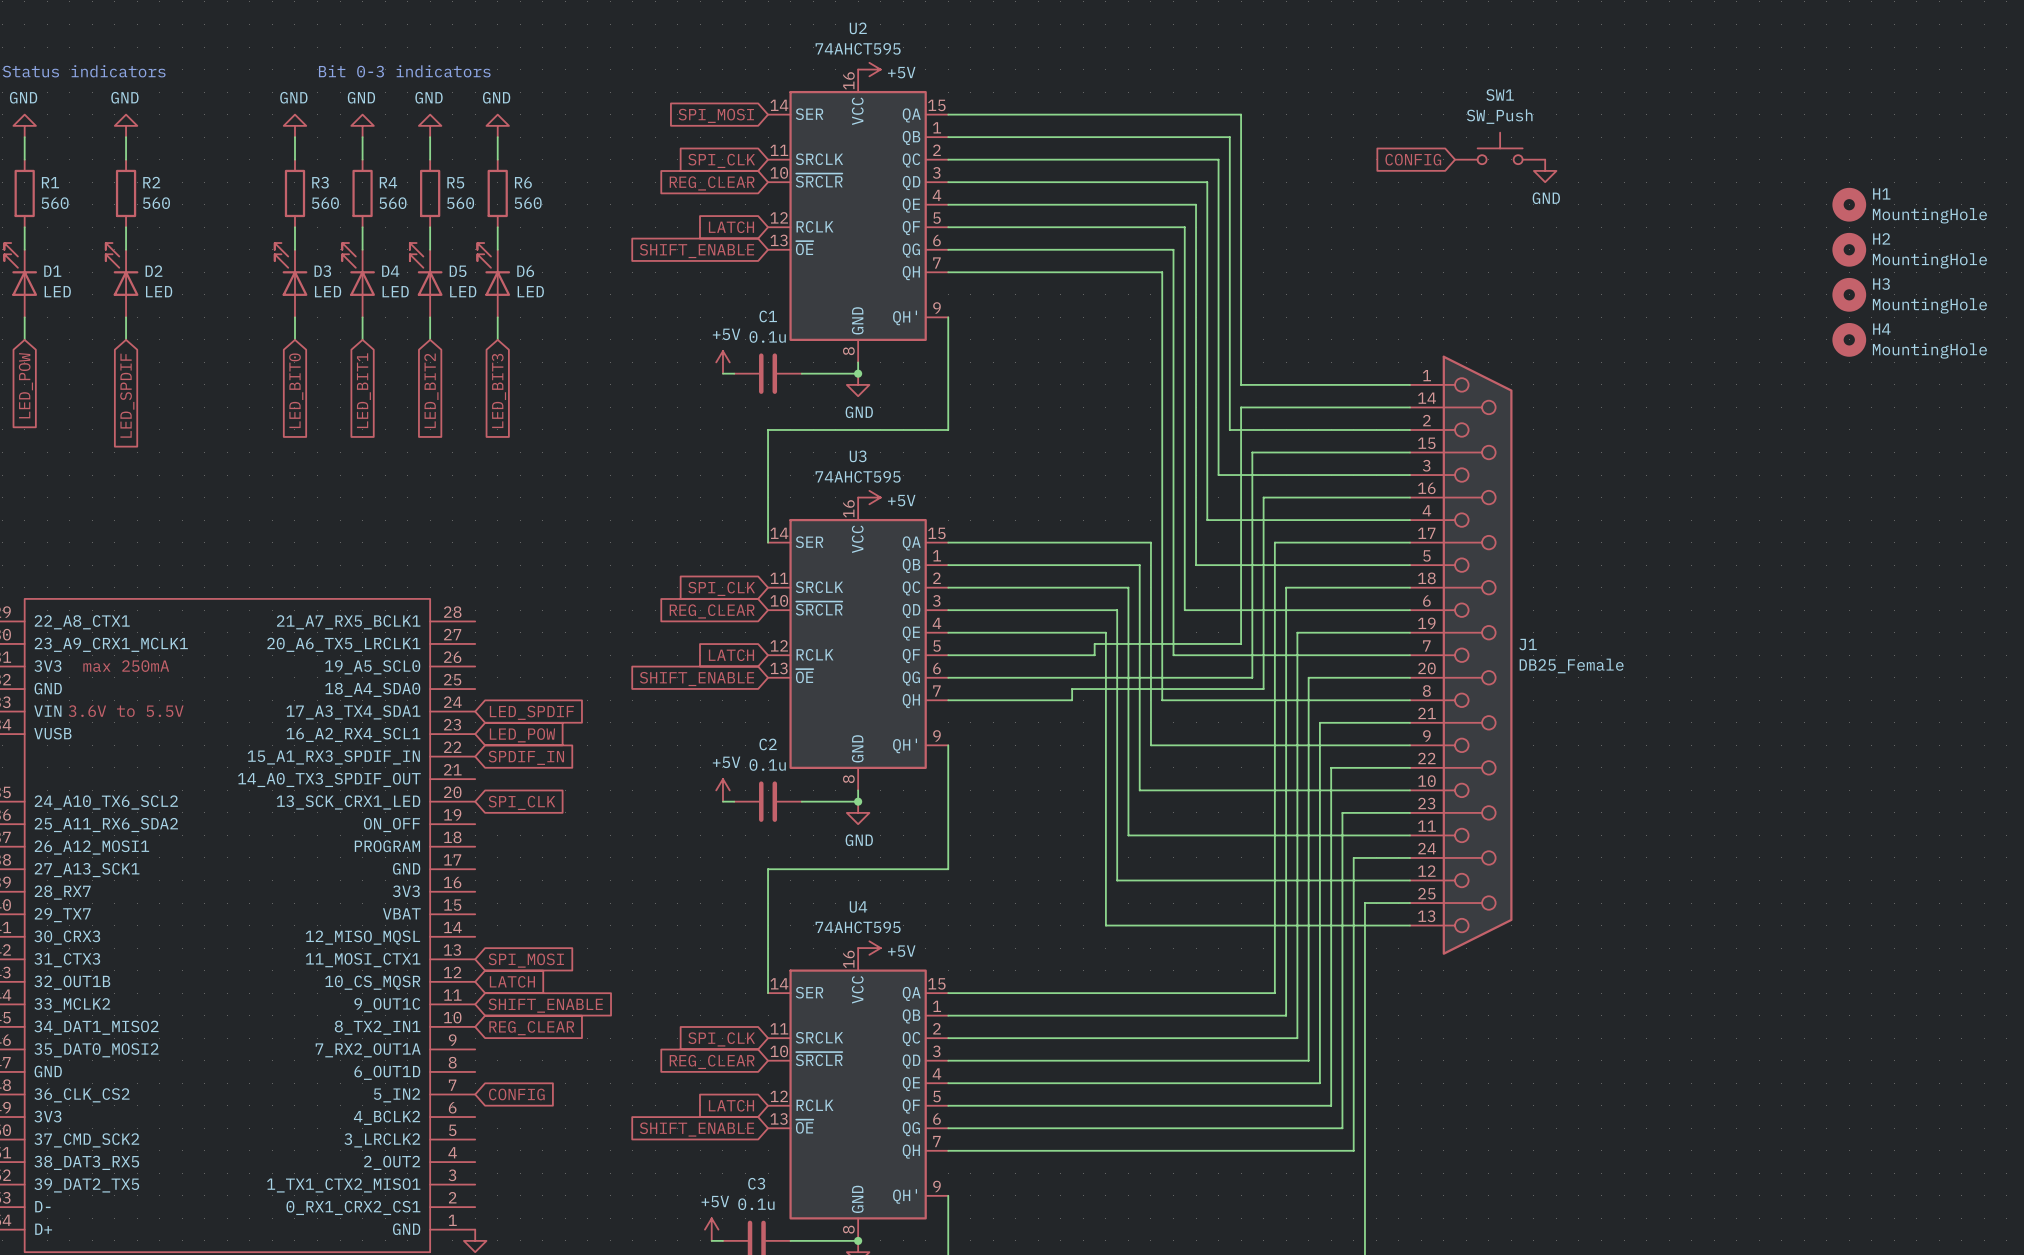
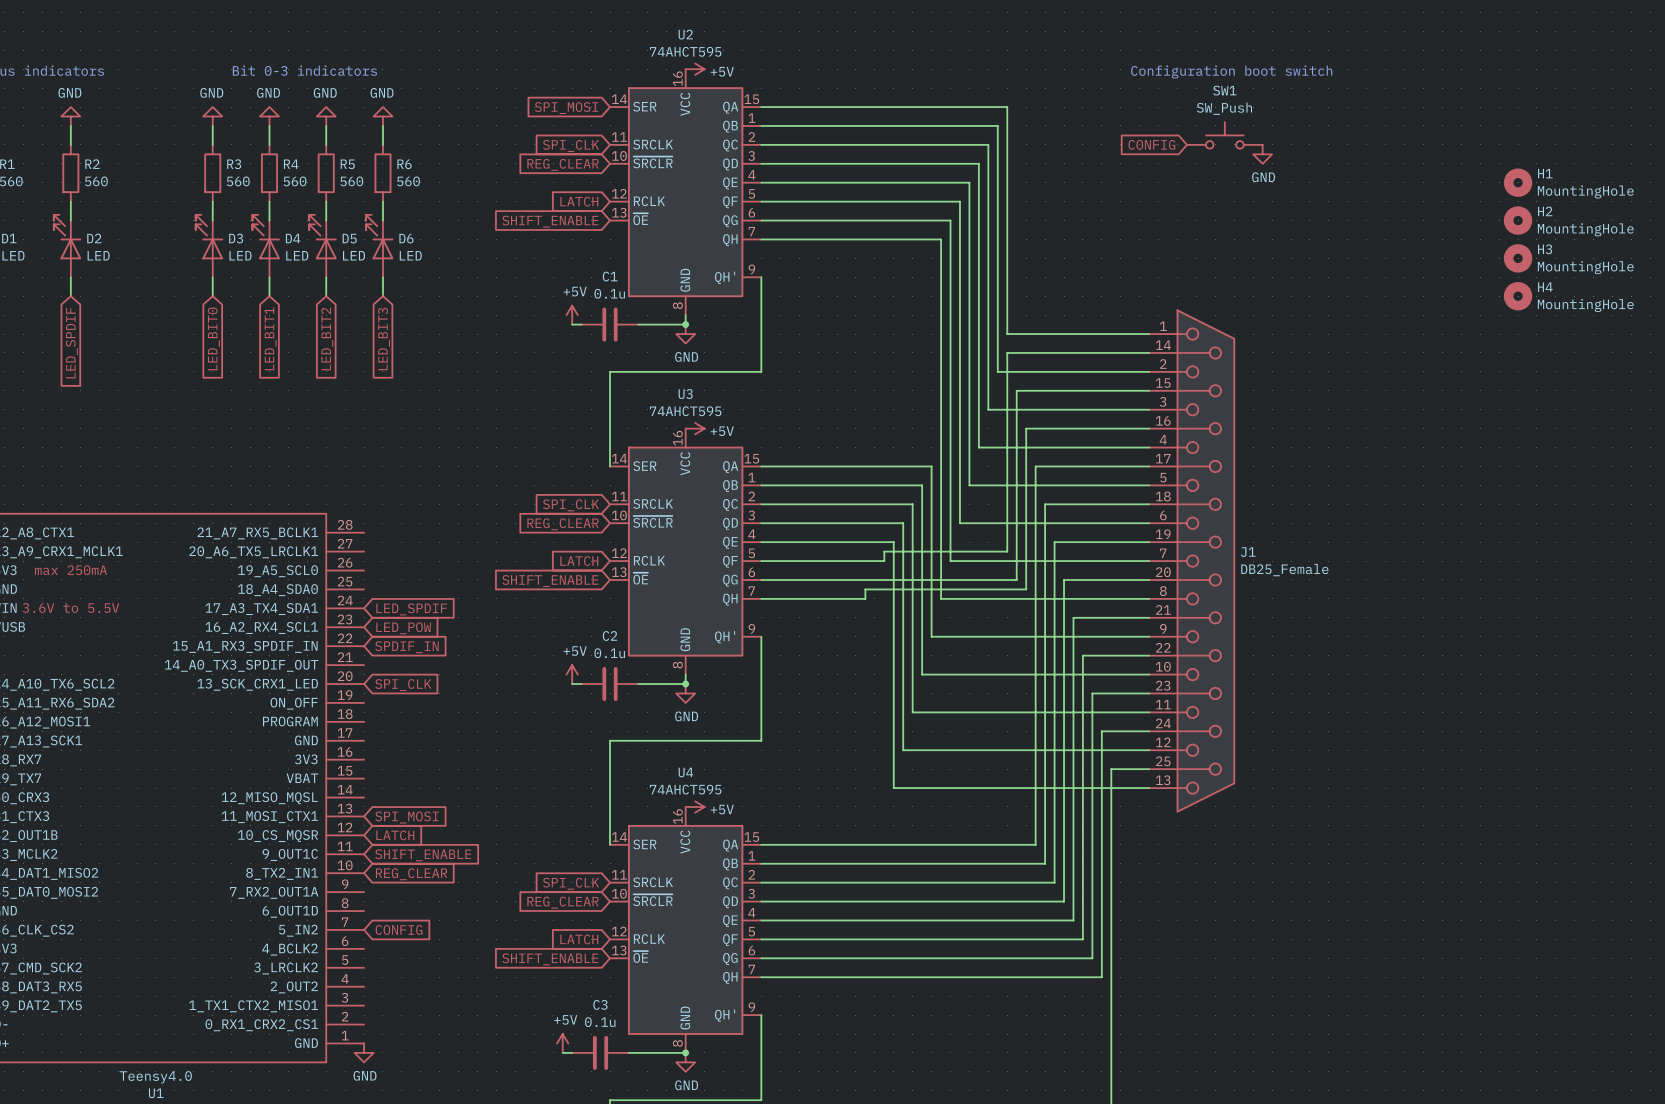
text: none -> Configuration boot switch (1231, 72)

